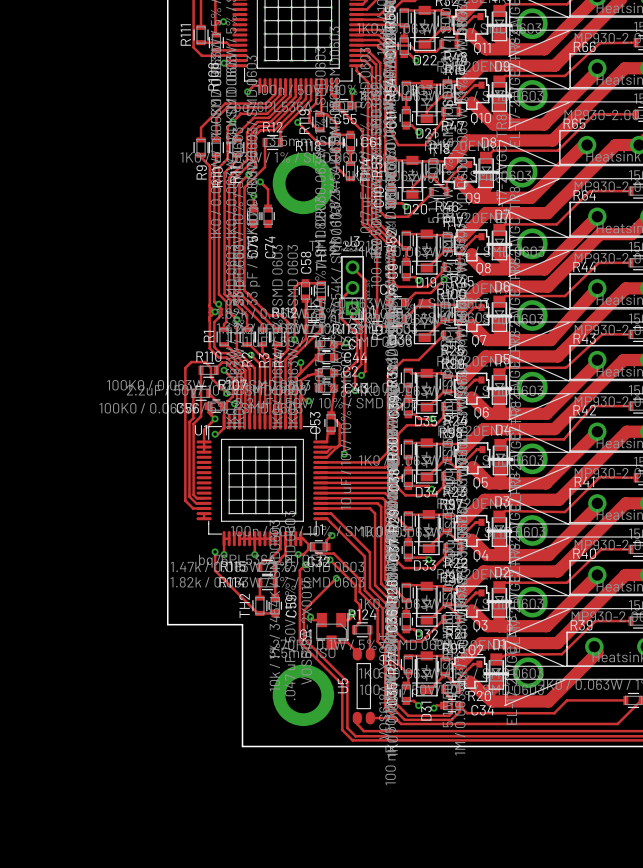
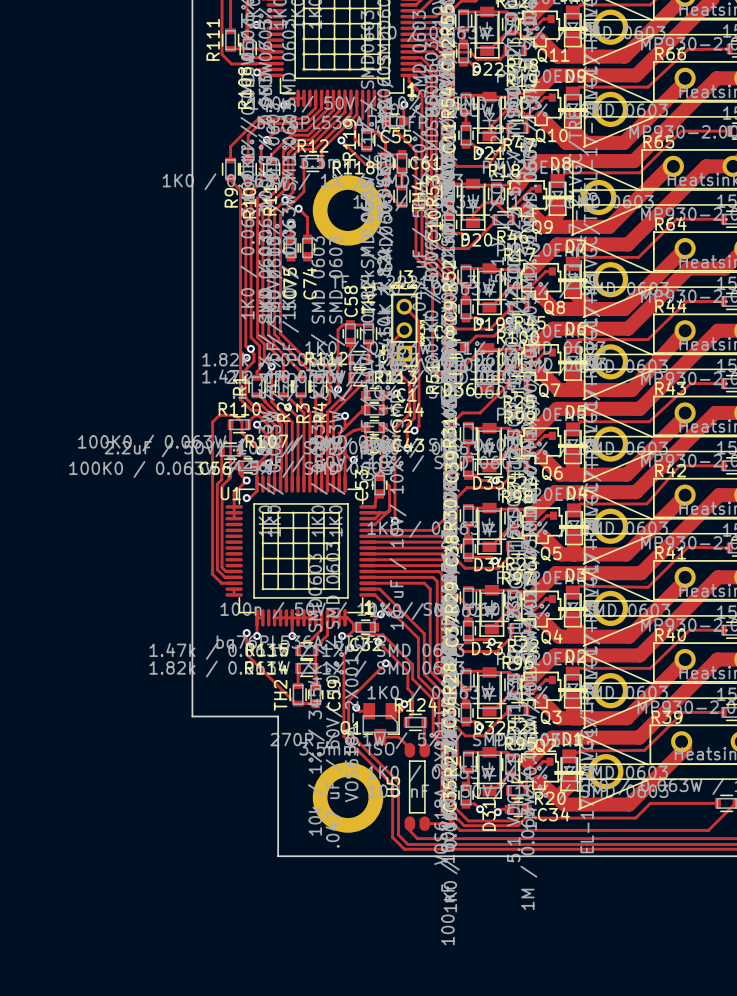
text: 1 (372, 310) -> none
text: 1 (382, 659) -> none

